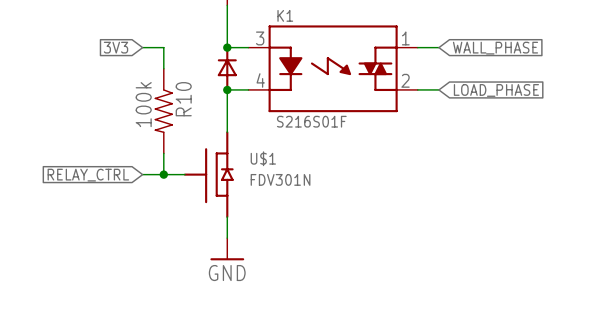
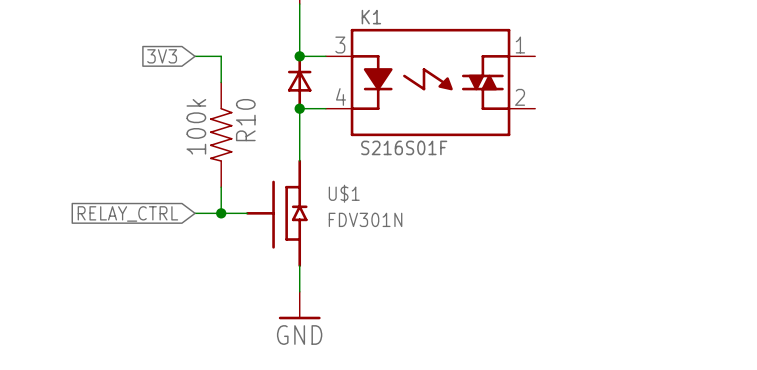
wire: (417, 47) (438, 47) -> none
global label: WALL_PHASE (495, 48) -> none
wire: (417, 89) (438, 89) -> none
global label: LOAD_PHASE (496, 90) -> none

